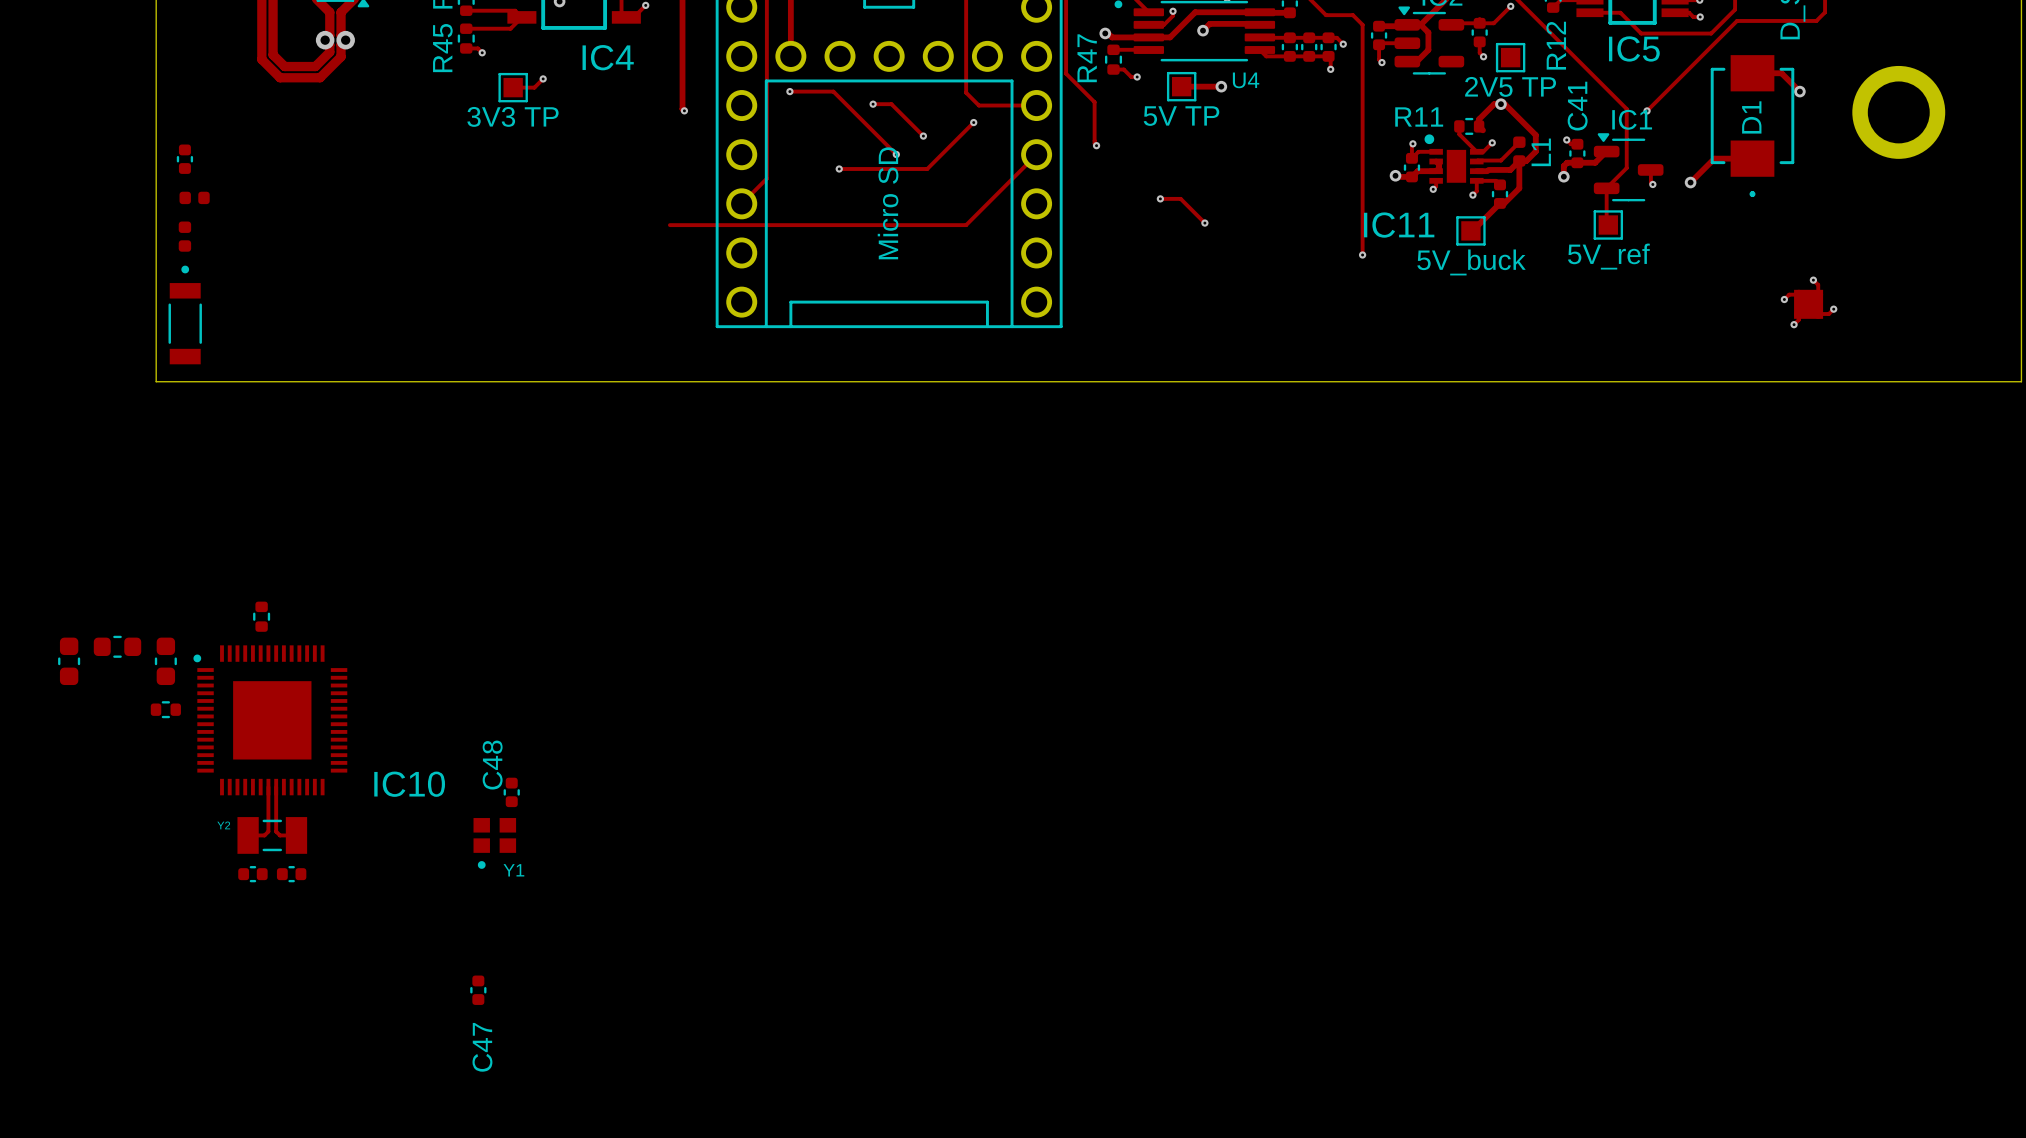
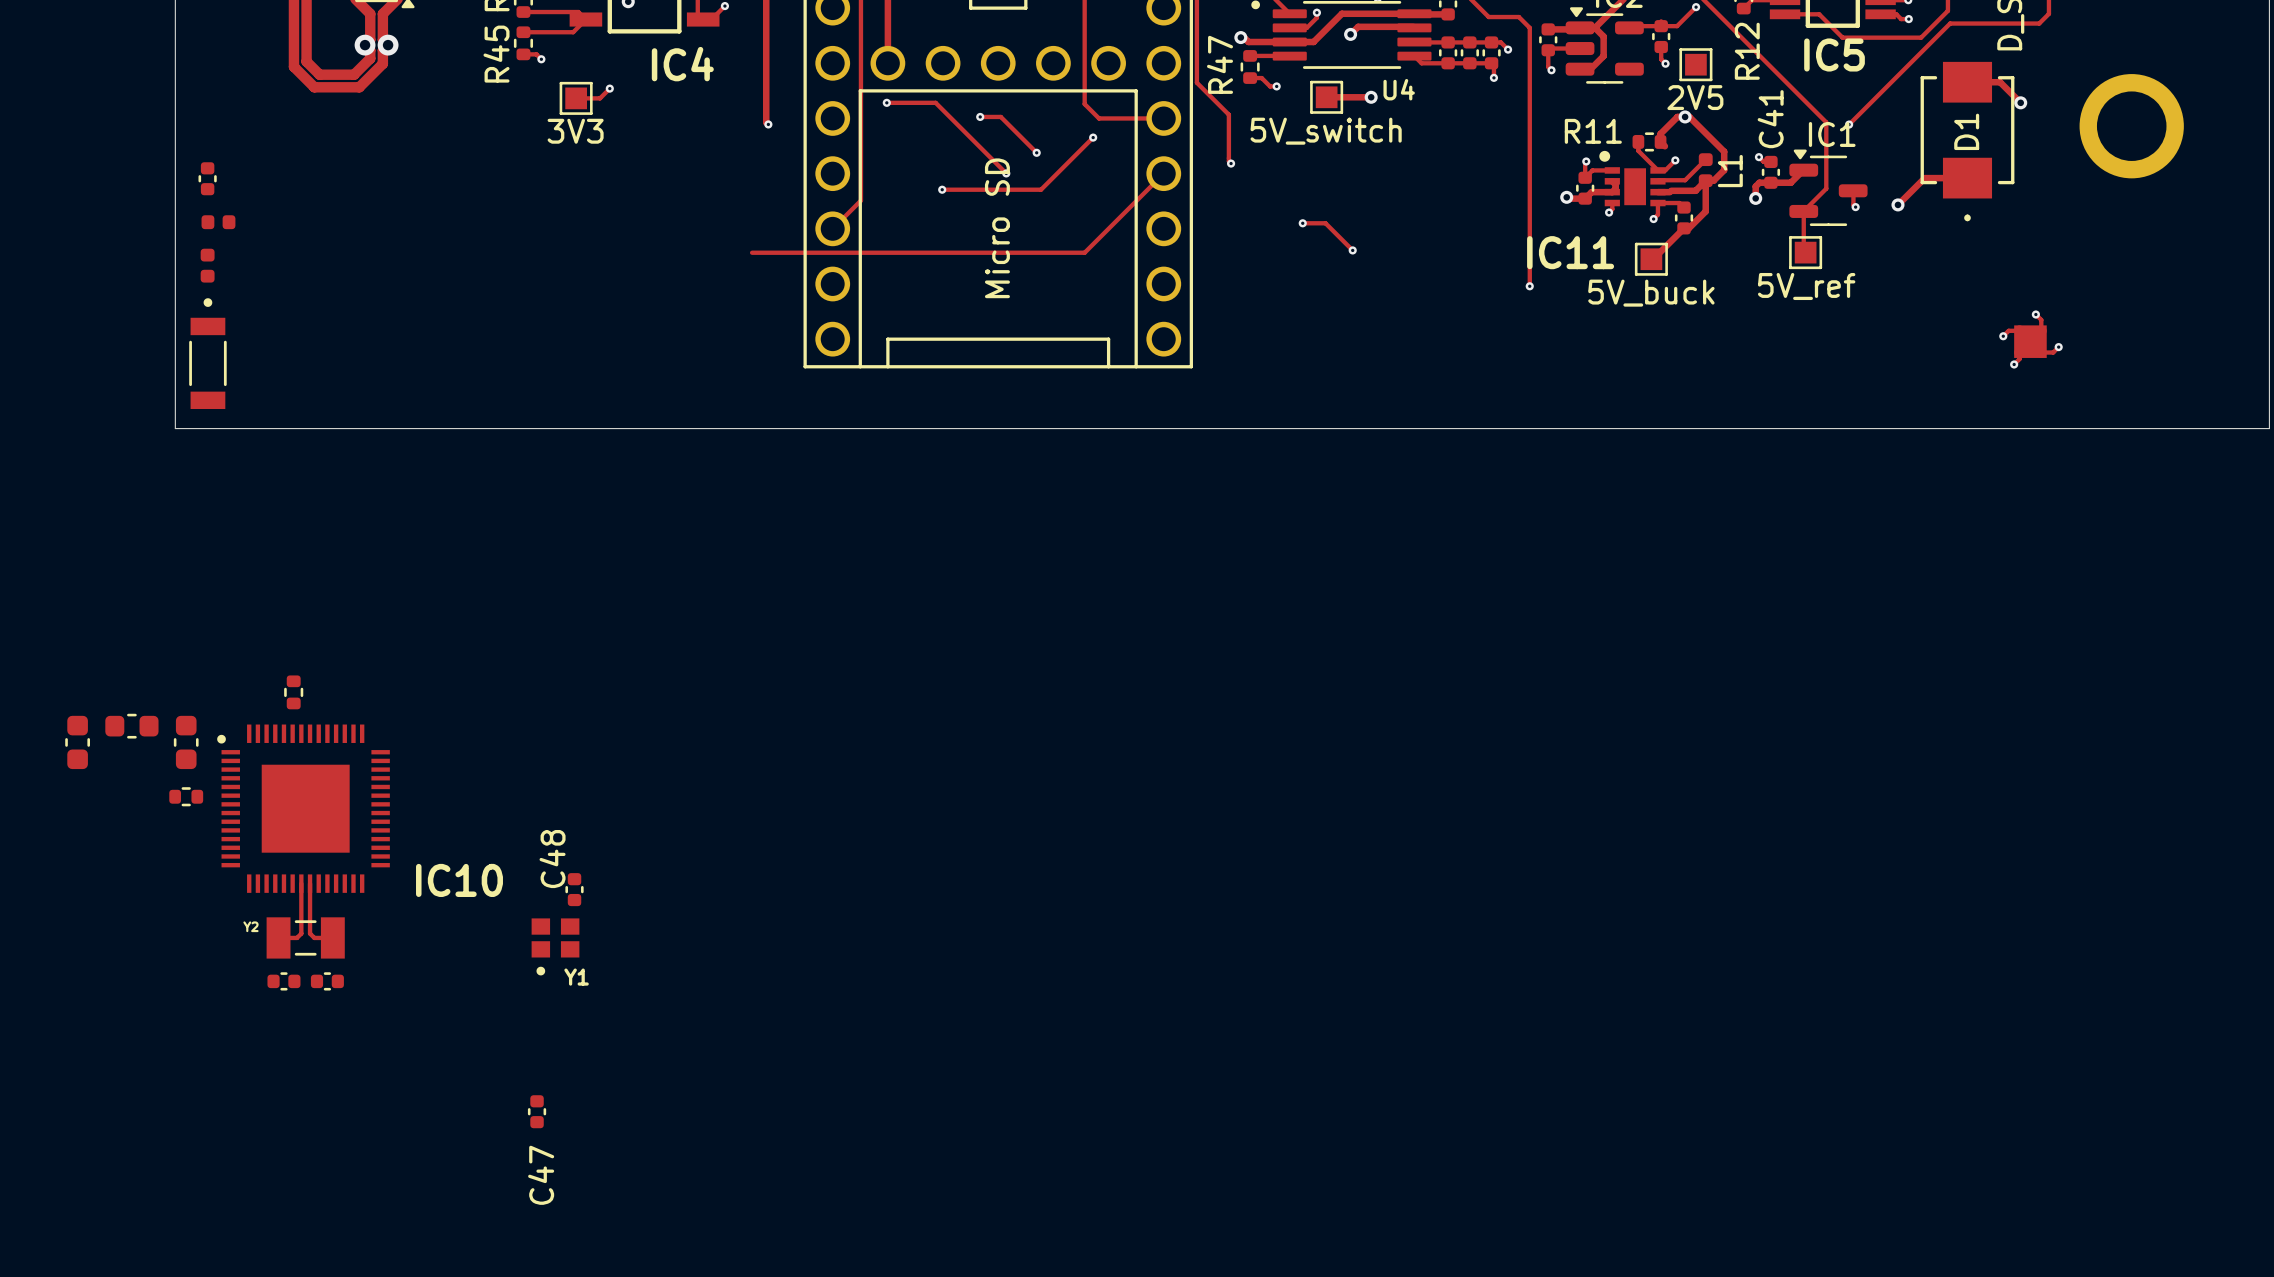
part value: 2V5 TP (1510, 86) -> 2V5 (1695, 97)
part value: 3V3 TP (512, 116) -> 3V3 (575, 131)
part value: 5V TP (1181, 116) -> 5V_switch (1326, 131)

